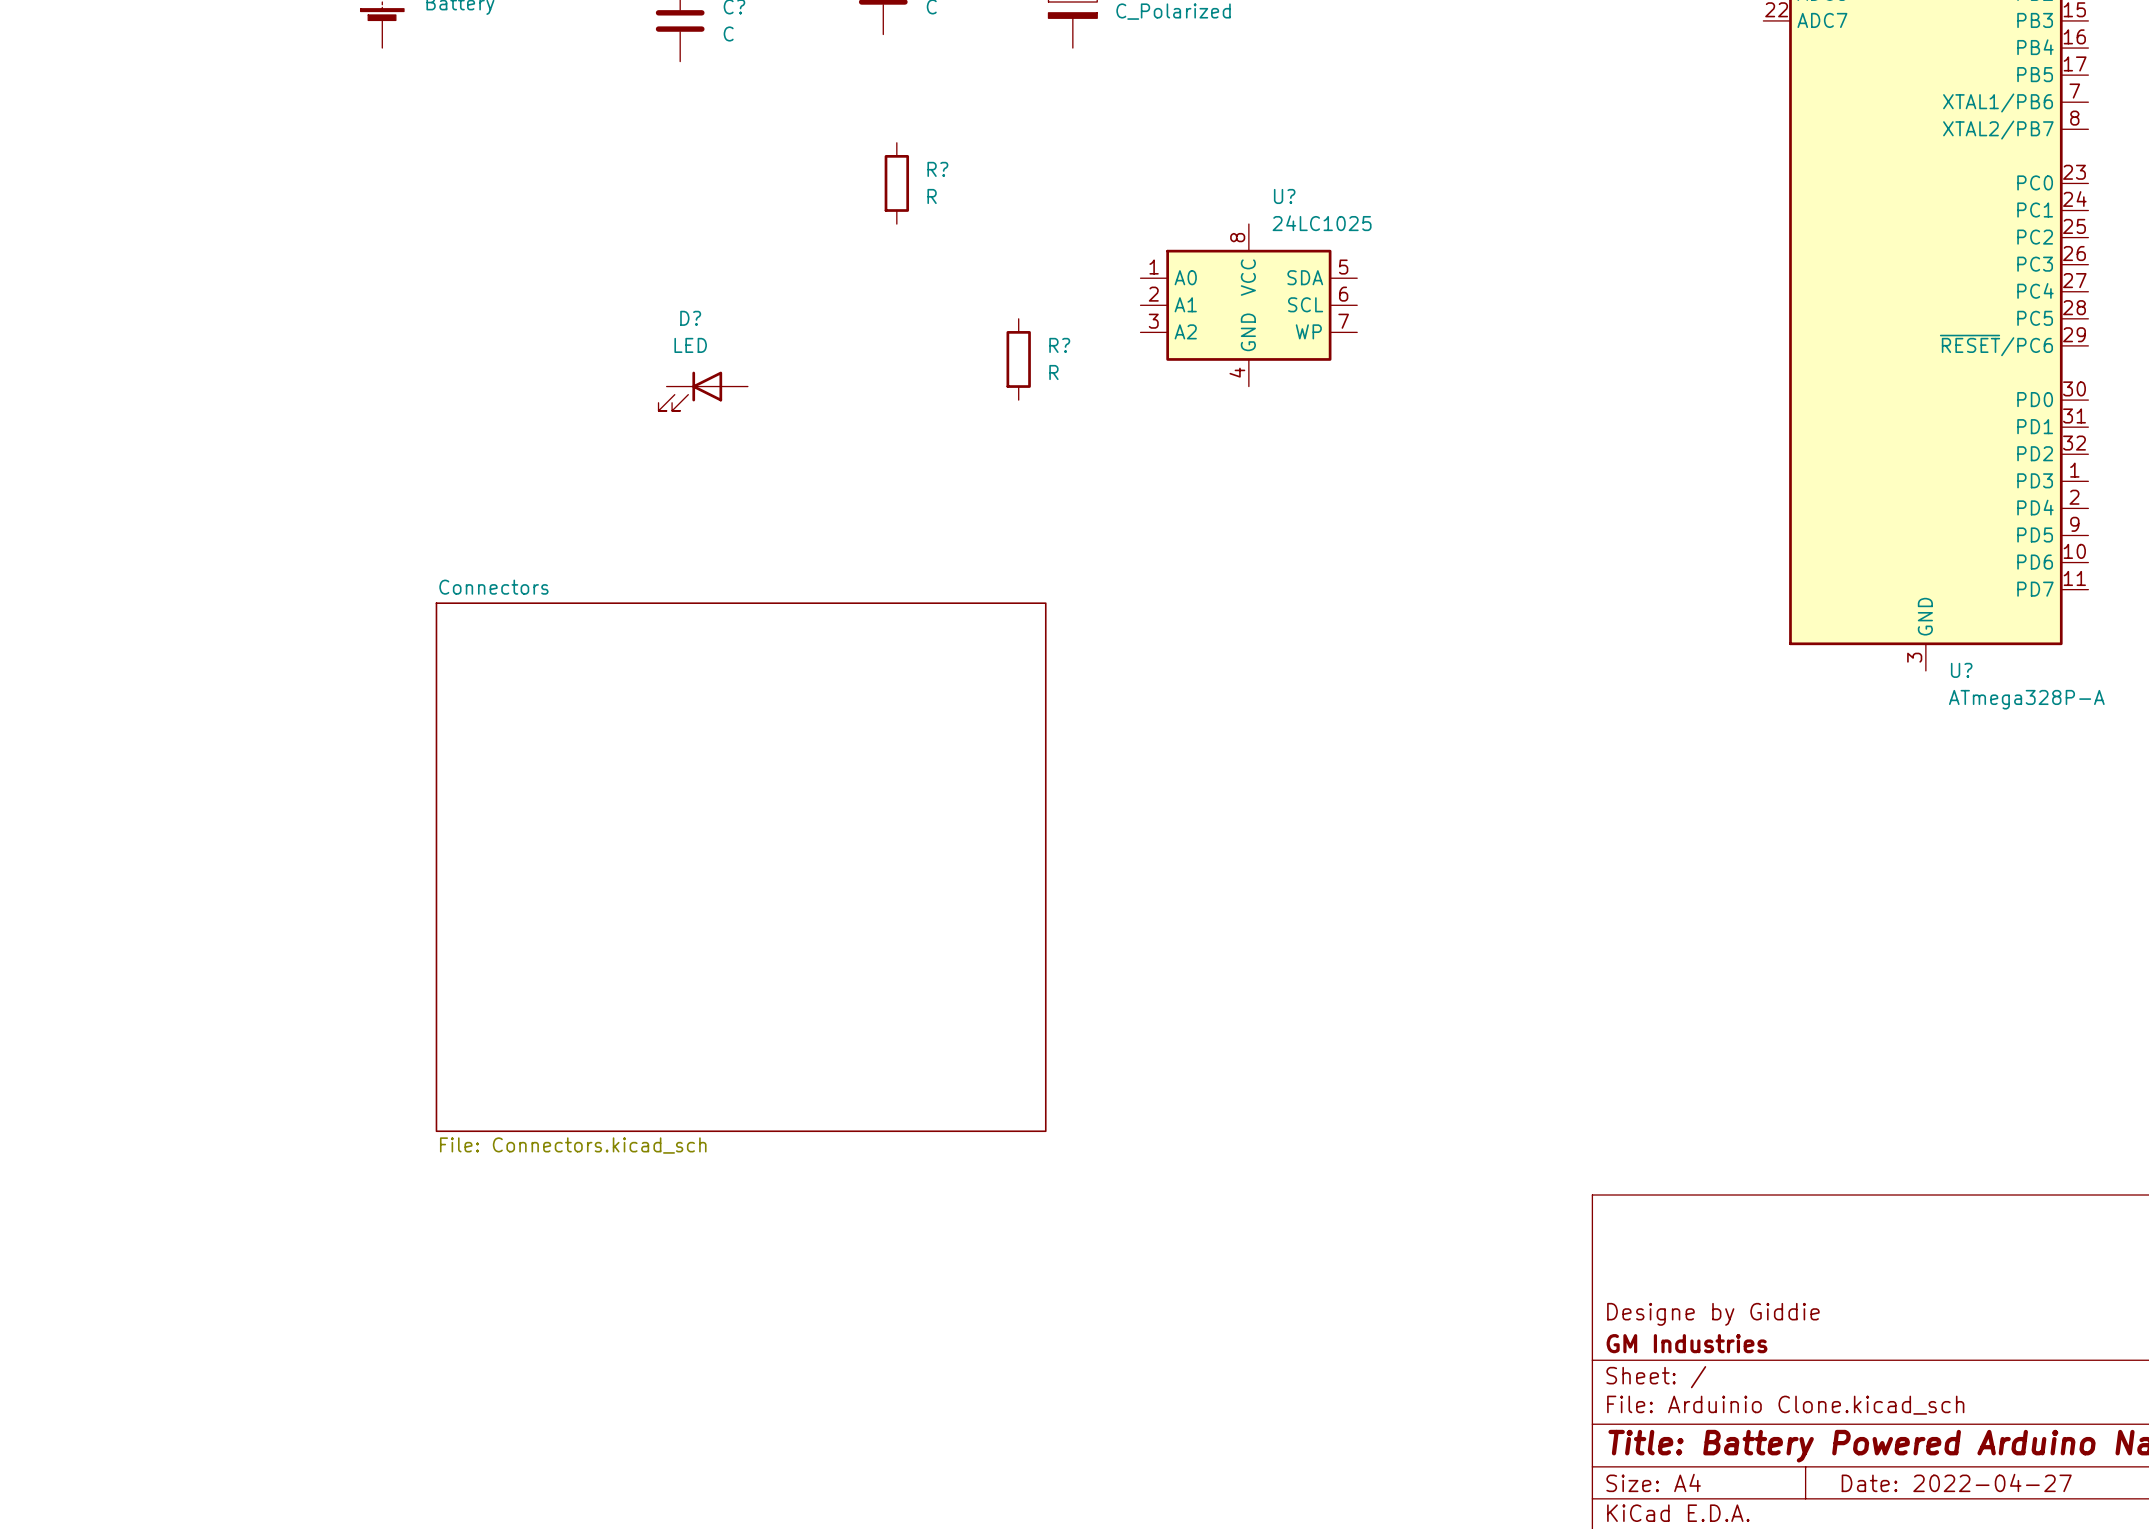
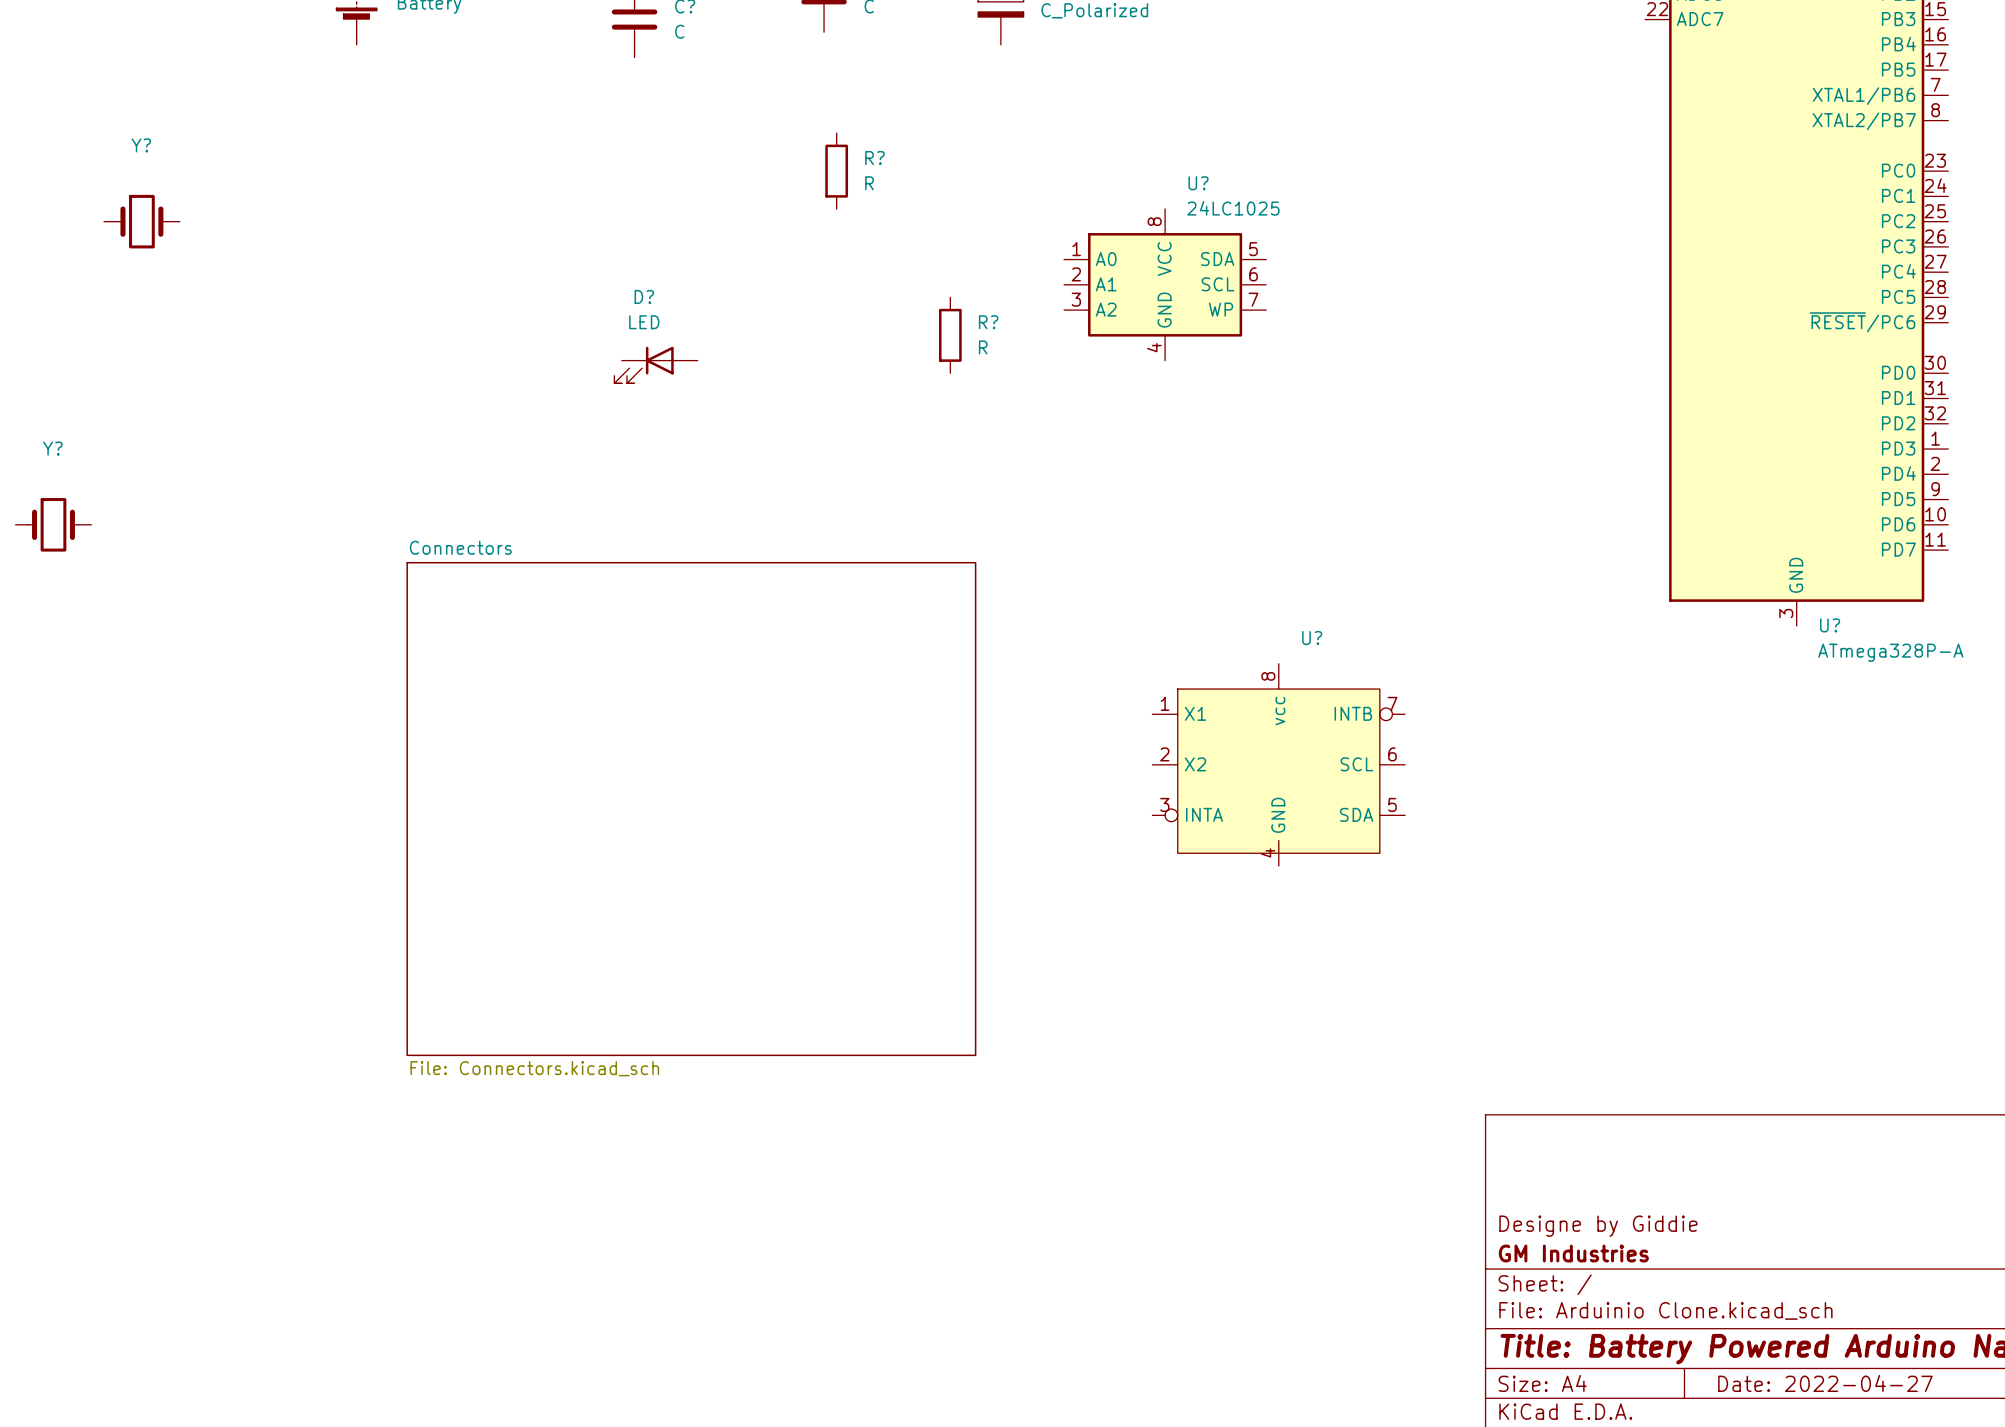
Y?: none -> (141, 221)
Y?: none -> (53, 524)
U?: none -> (1278, 764)

